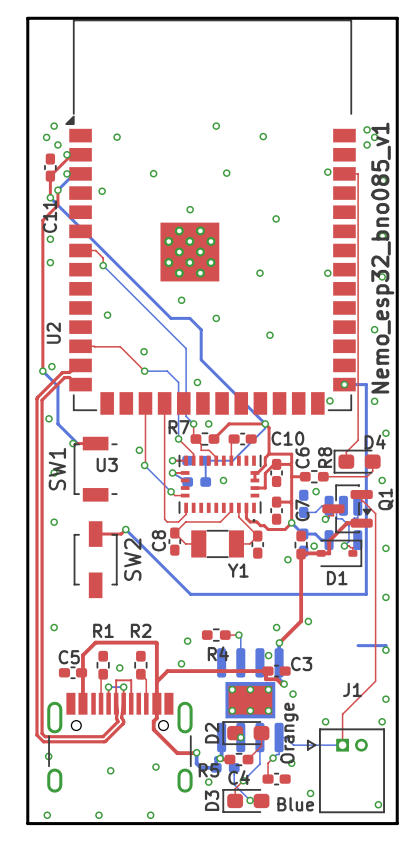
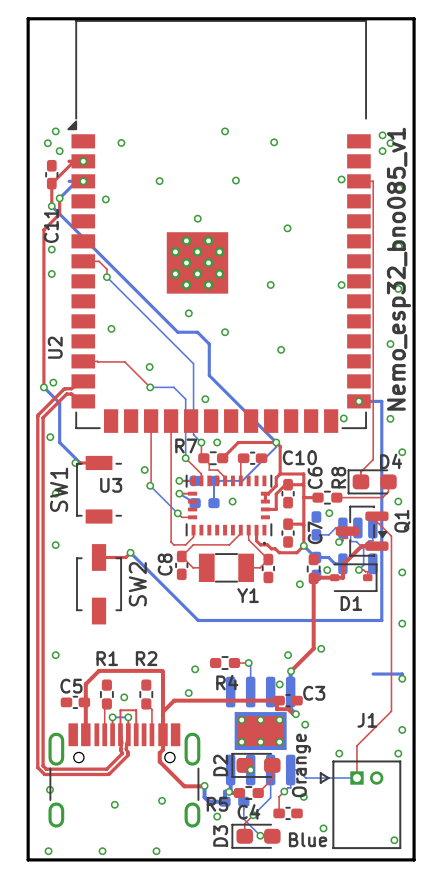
via: (66, 154) -> none
via: none -> (83, 161)
via: (66, 173) -> none
via: none -> (83, 181)

